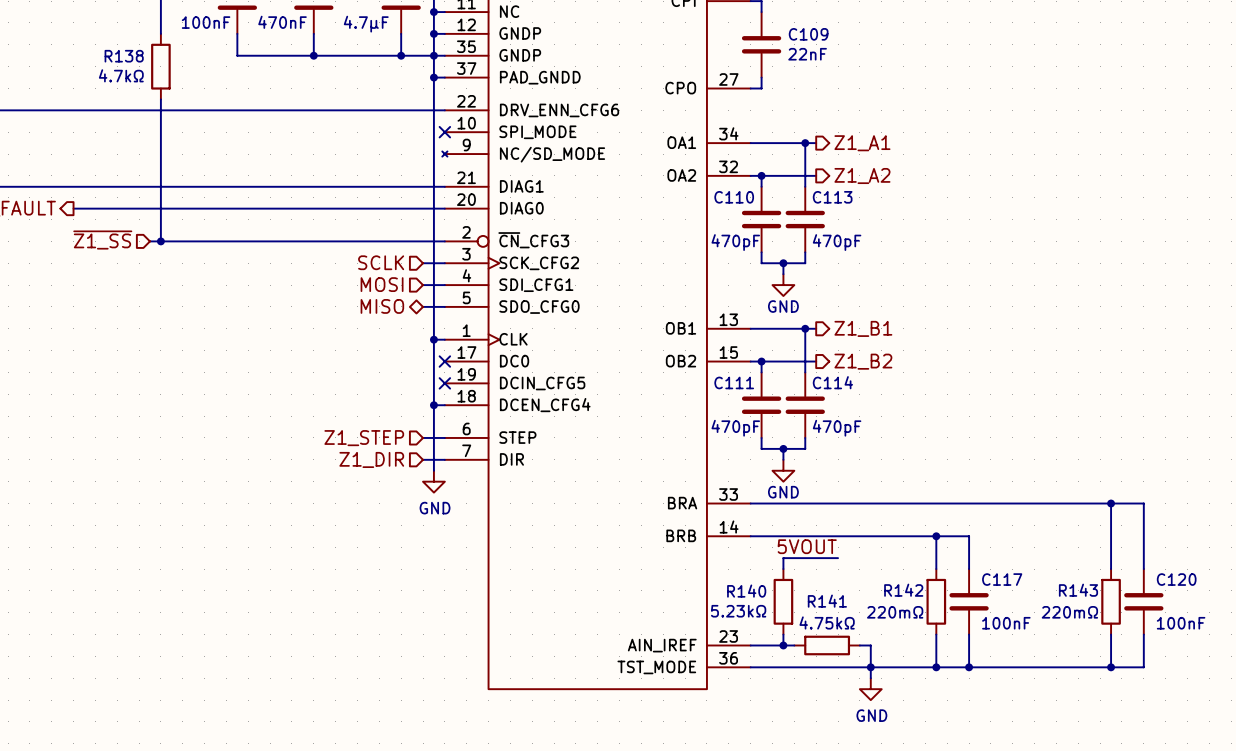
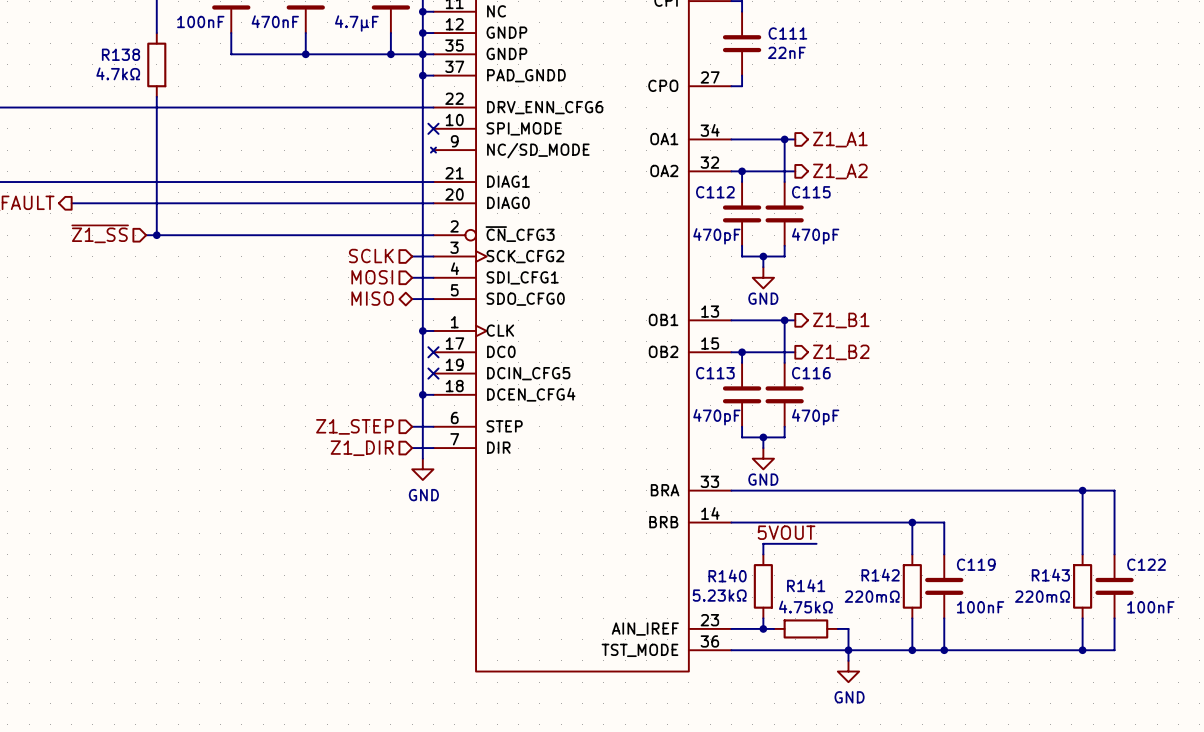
C109 name: C109 (808, 34) -> C111 (787, 33)
C110 name: C110 (734, 197) -> C112 (715, 192)
C113 name: C113 (832, 197) -> C115 (811, 192)
C111 name: C111 (734, 382) -> C113 (715, 373)
C114 name: C114 (832, 382) -> C116 (811, 373)
C117 name: C117 (1002, 579) -> C119 (976, 564)
C120 name: C120 (1176, 579) -> C122 (1146, 564)

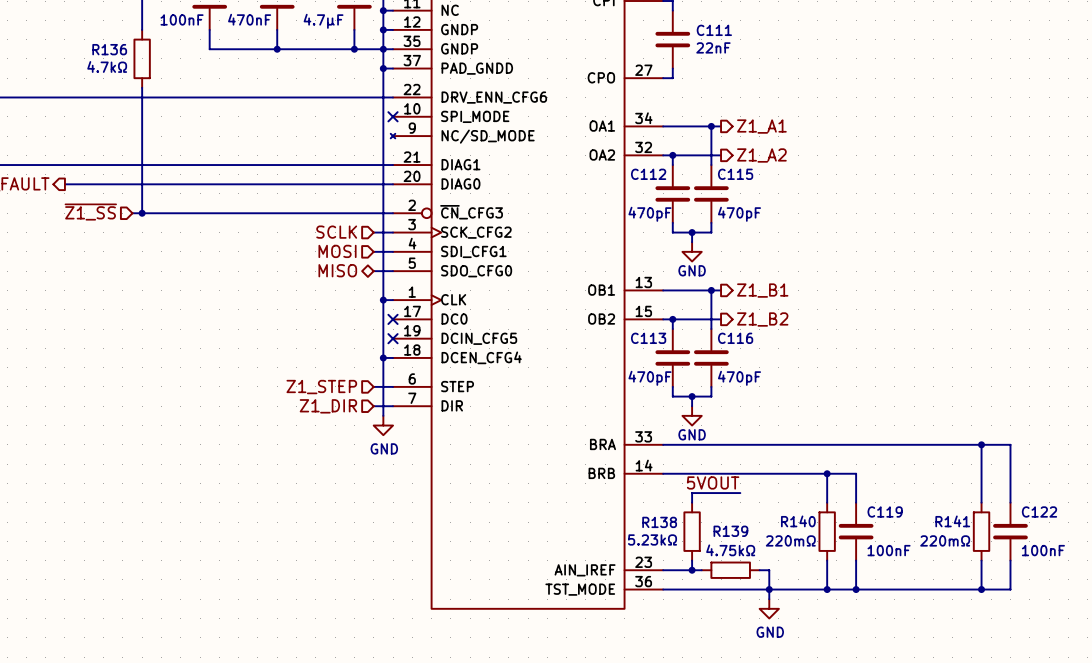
R138 name: R138 (120, 54) -> R136 (109, 49)
R140 name: R140 (727, 575) -> R138 (659, 522)
R142 name: R142 (880, 575) -> R140 (798, 521)
R143 name: R143 (1050, 575) -> R141 (952, 521)
R141 name: R141 (806, 585) -> R139 (730, 531)

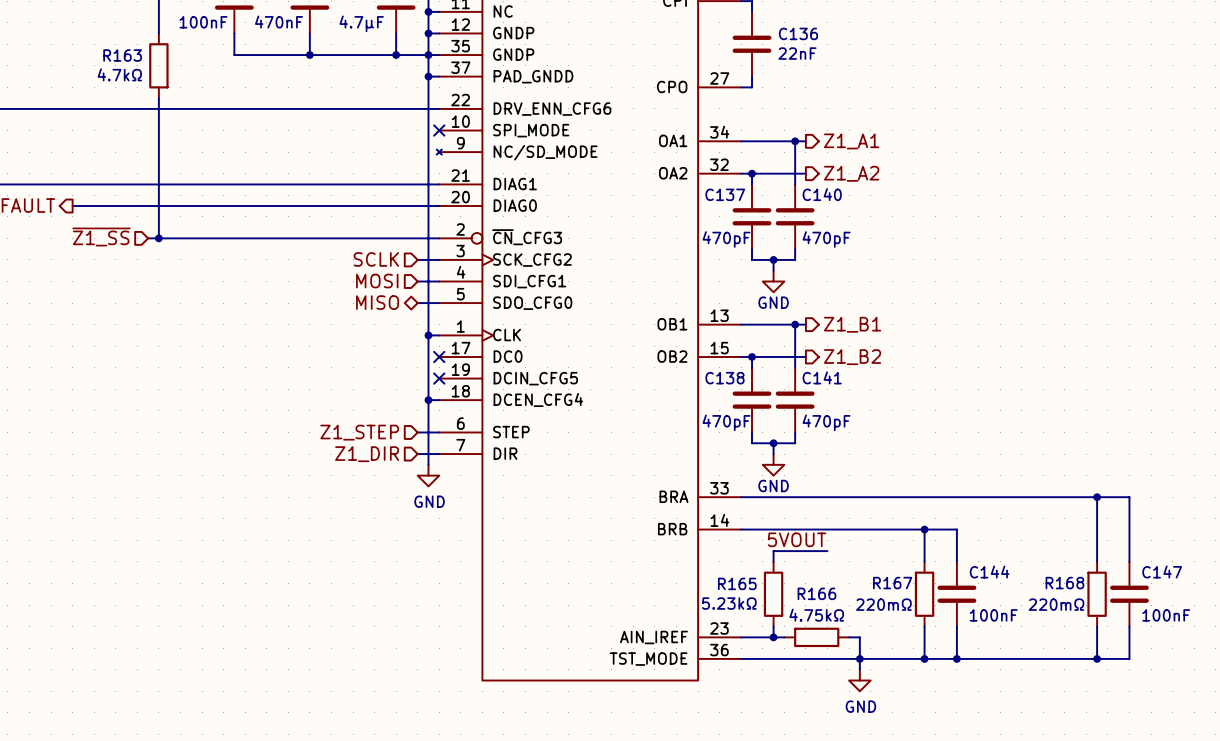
C111 name: C111 (714, 30) -> C136 (798, 33)
R136 name: R136 (109, 49) -> R163 (122, 55)
C112 name: C112 (648, 174) -> C137 (725, 194)
C115 name: C115 (735, 174) -> C140 (822, 194)
C113 name: C113 (648, 338) -> C138 (724, 378)
C116 name: C116 (735, 338) -> C141 (822, 377)
C119 name: C119 (885, 511) -> C144 (989, 572)
C122 name: C122 (1039, 511) -> C147 (1162, 572)
R140 name: R140 (798, 521) -> R167 (892, 583)
R141 name: R141 (952, 521) -> R168 (1064, 583)
R138 name: R138 (659, 522) -> R165 (737, 583)
R139 name: R139 (730, 531) -> R166 (816, 593)

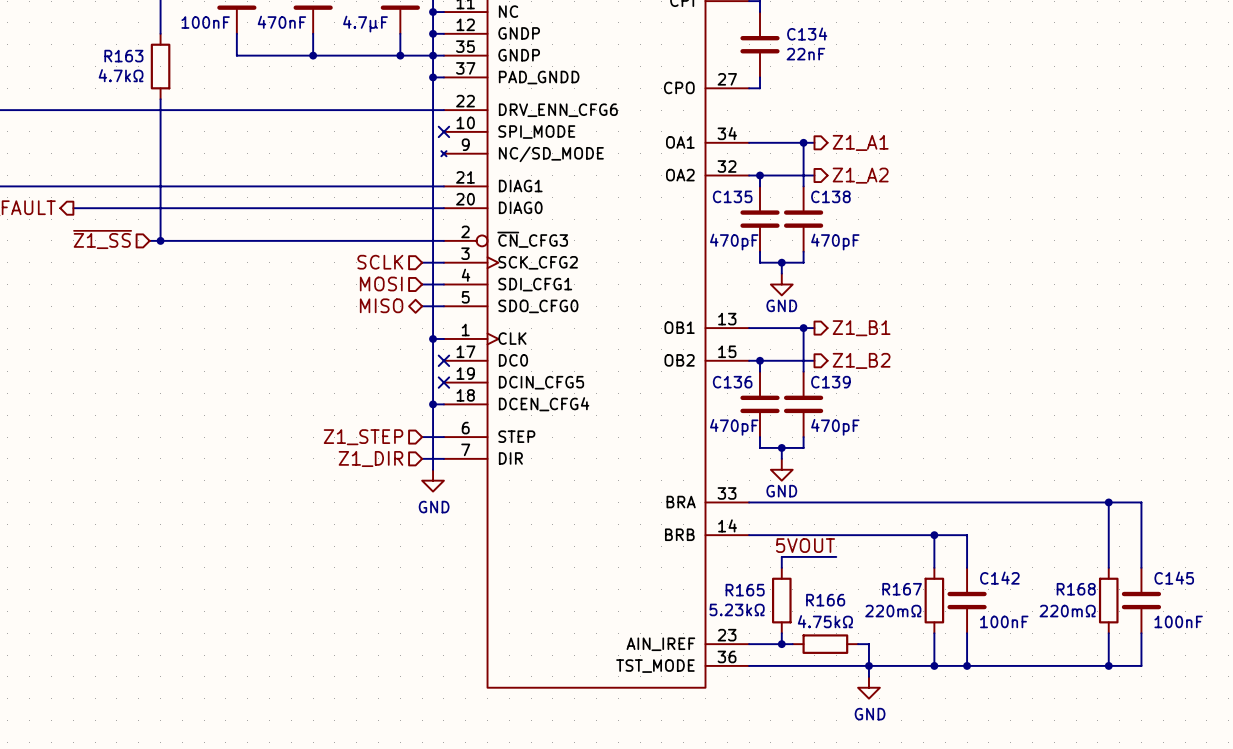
C136 name: C136 (798, 33) -> C134 (807, 34)
C137 name: C137 (725, 194) -> C135 (732, 196)
C140 name: C140 (822, 194) -> C138 (830, 196)
C141 name: C141 (822, 377) -> C139 (830, 382)
C138 name: C138 (724, 378) -> C136 (732, 382)
C144 name: C144 (989, 572) -> C142 (999, 578)
C147 name: C147 (1162, 572) -> C145 (1174, 578)

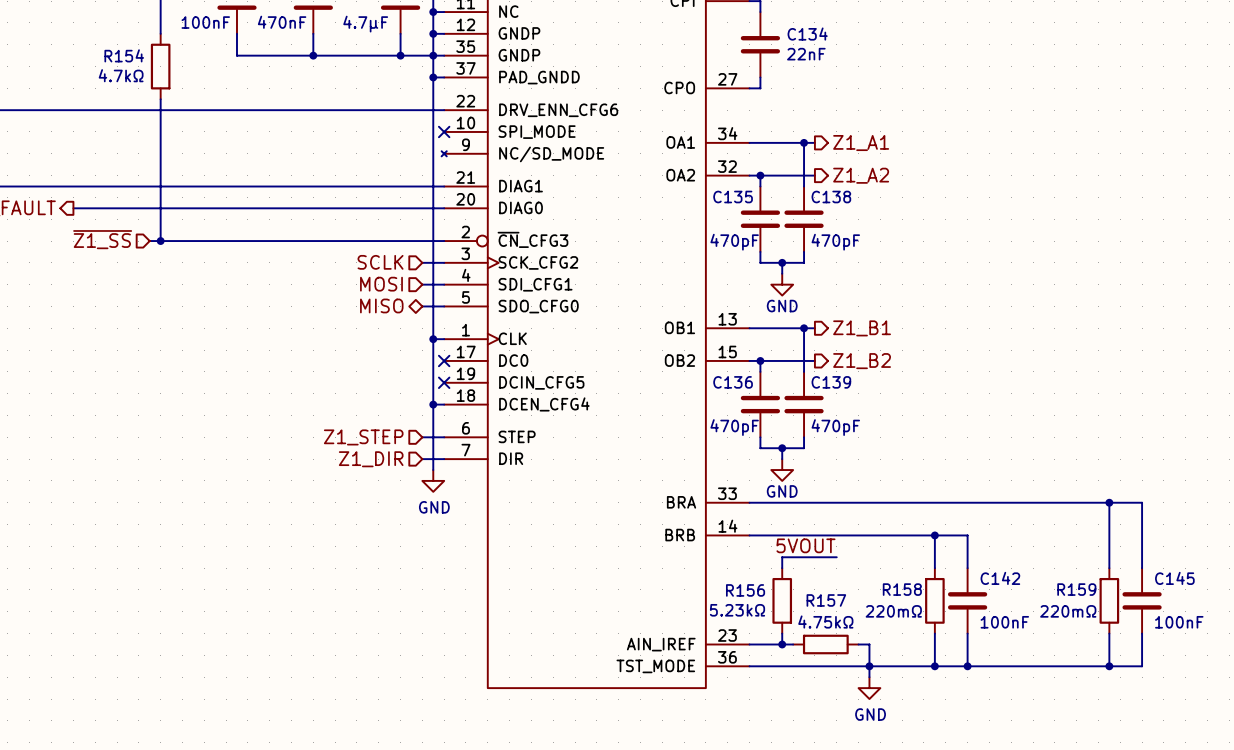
R163 name: R163 (123, 56) -> R154 (124, 55)
R167 name: R167 (902, 589) -> R158 (902, 589)
R168 name: R168 (1076, 589) -> R159 (1076, 589)
R165 name: R165 (745, 590) -> R156 (745, 590)
R166 name: R166 (825, 600) -> R157 (826, 600)

